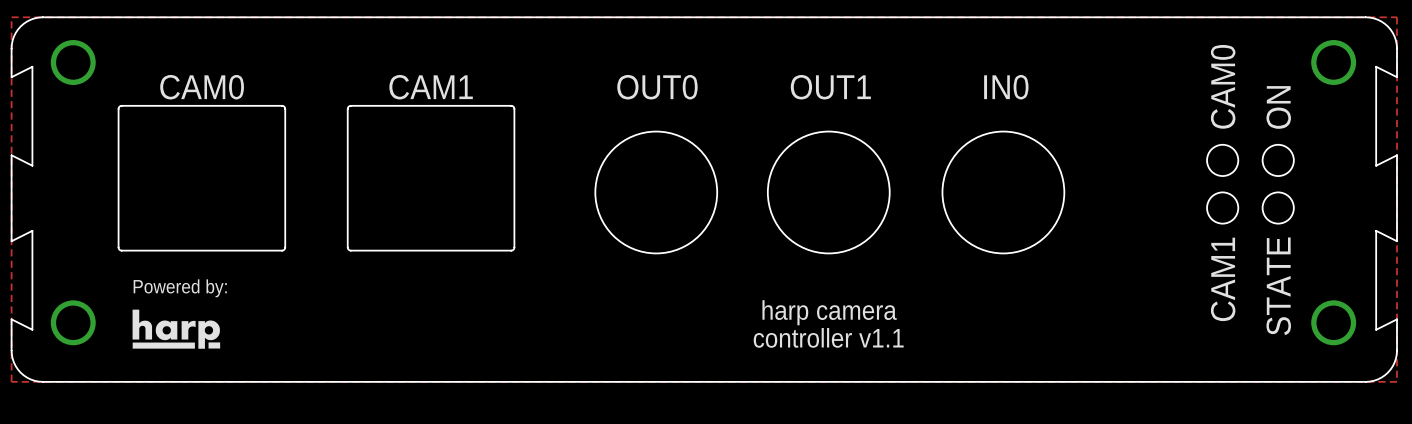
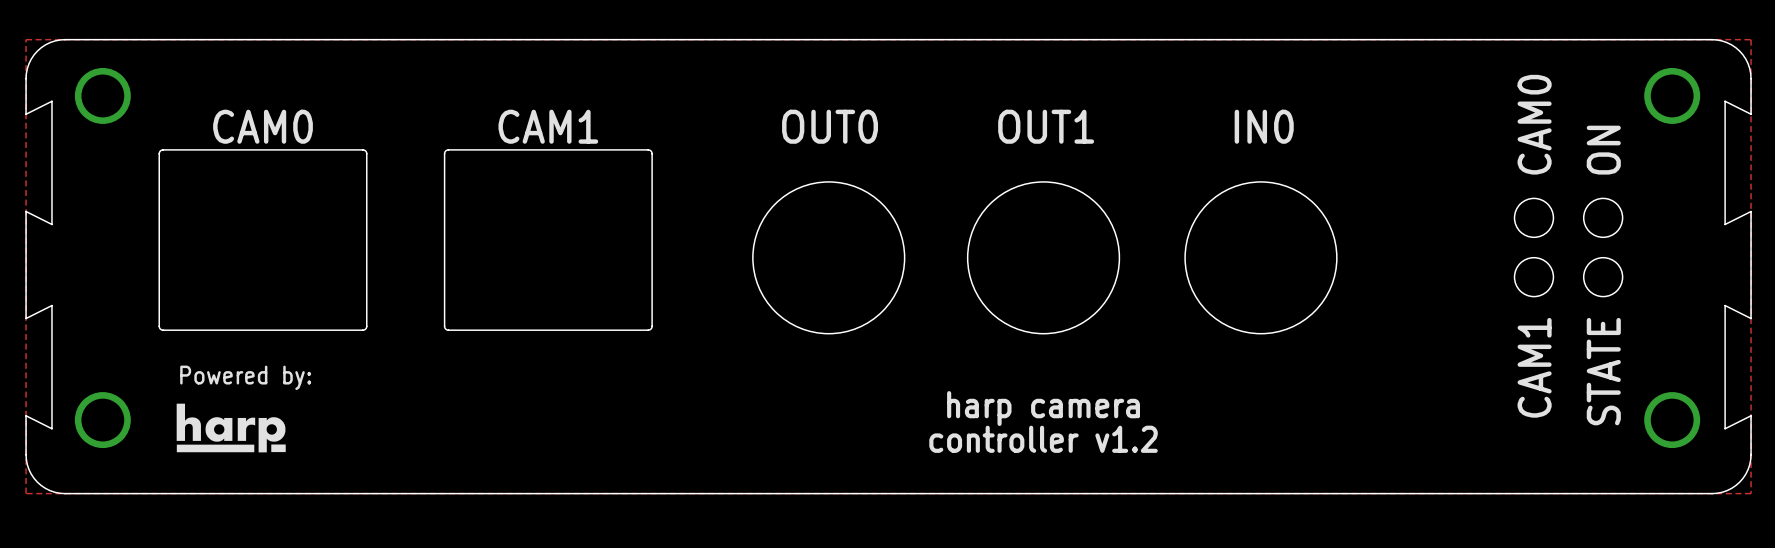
text: controller v1.1 (828, 337) -> controller v1.2 (1043, 439)

